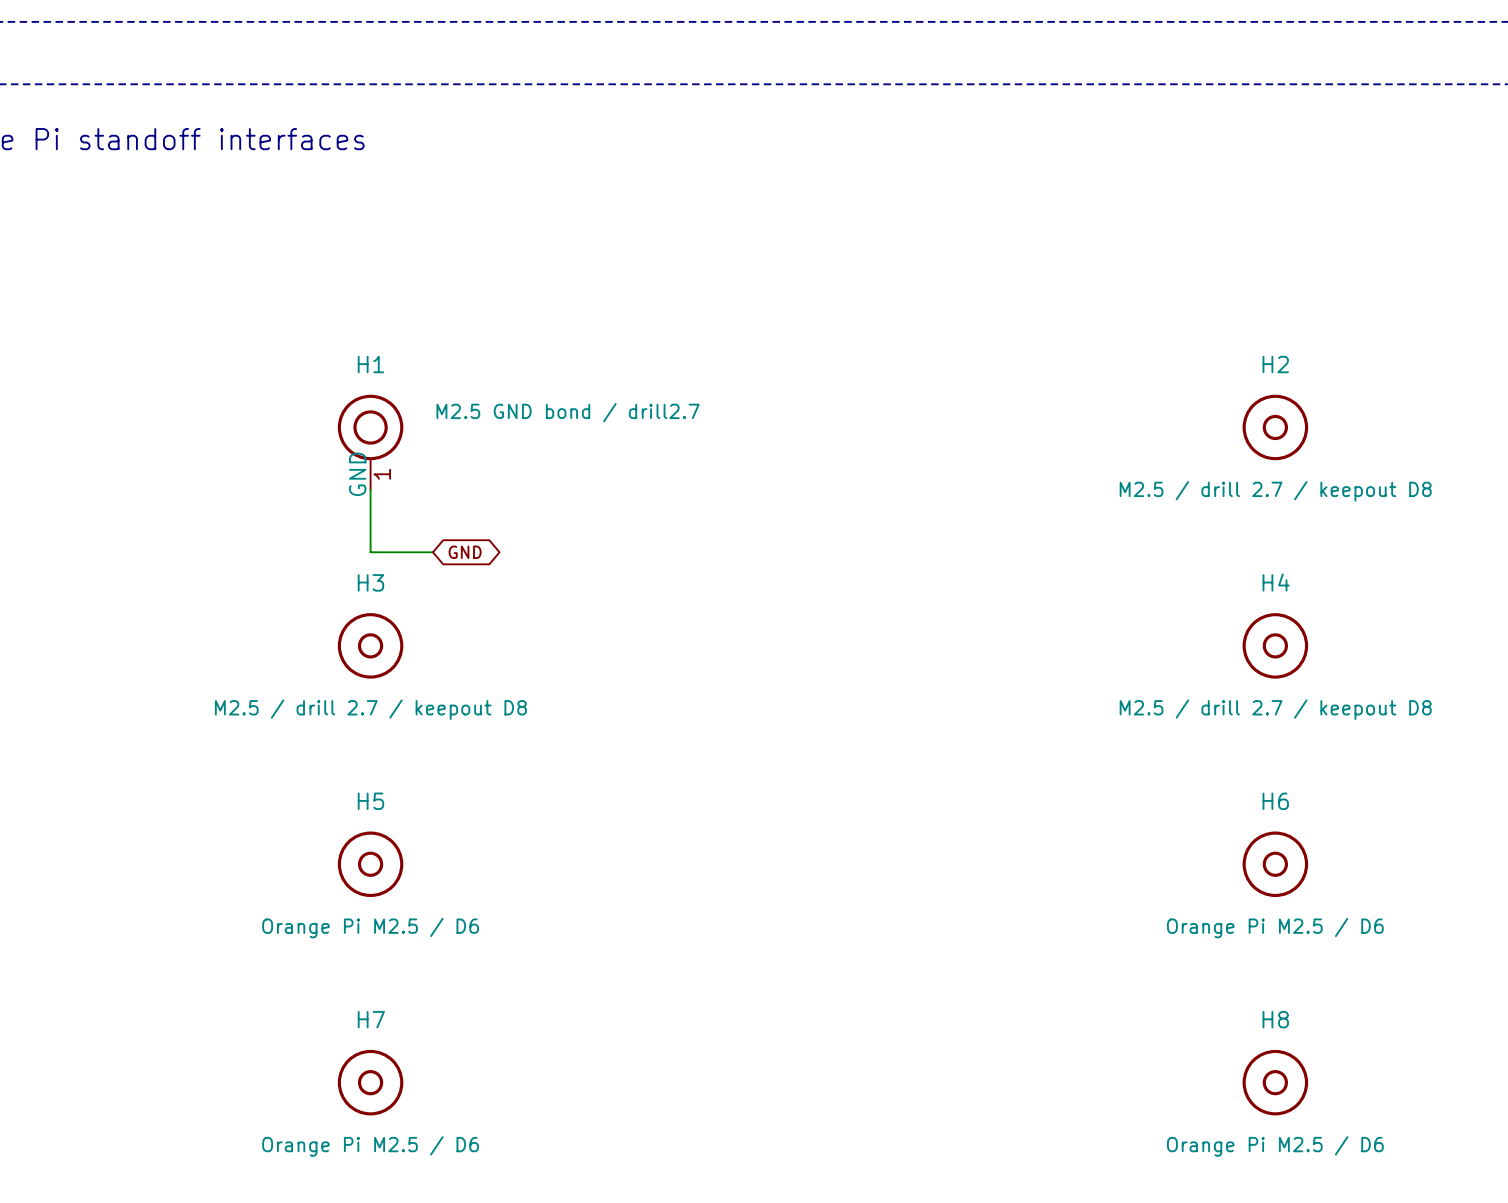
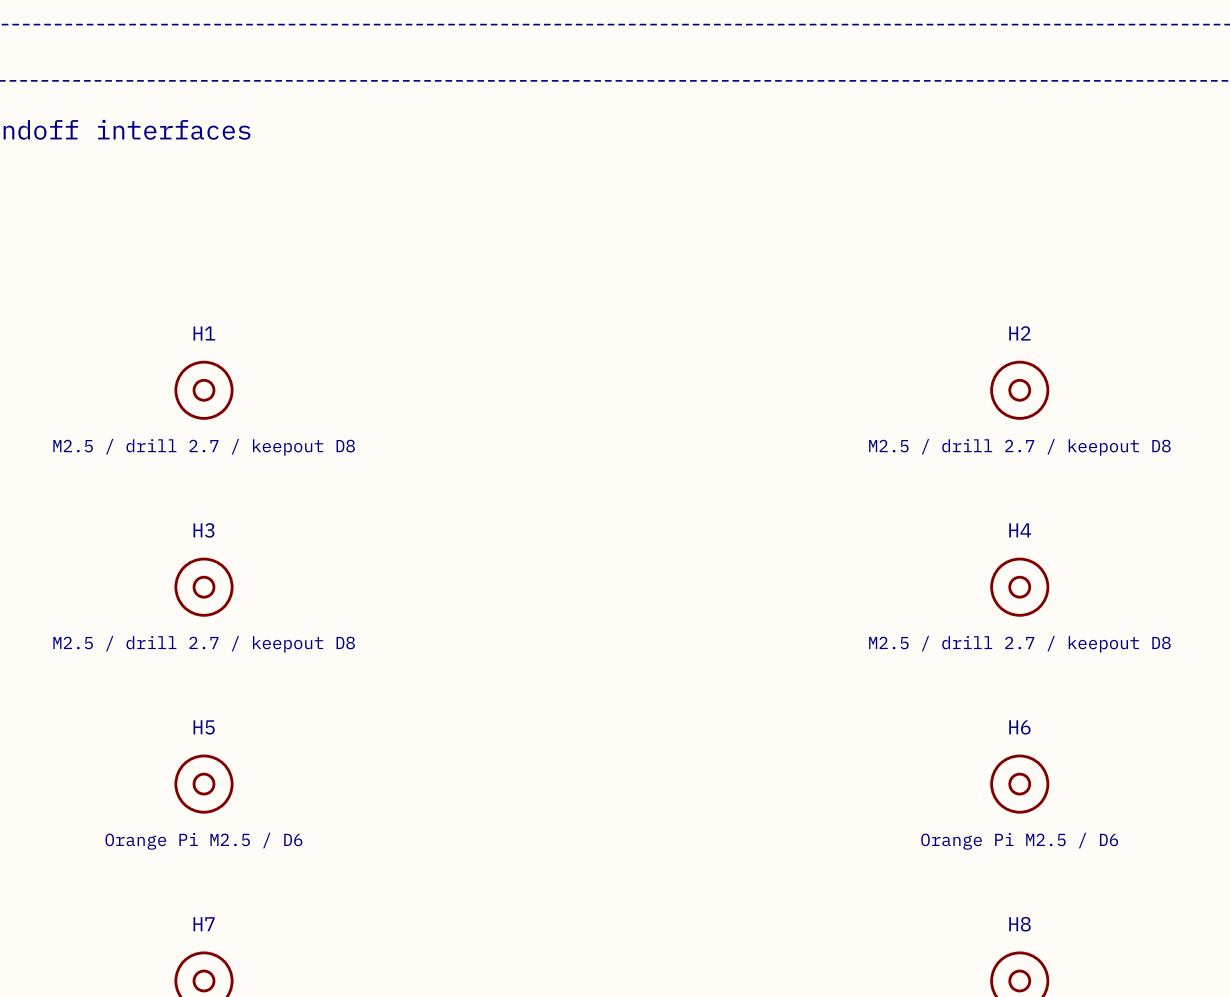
H1 symbol: [337, 394, 404, 490] -> [174, 360, 234, 420]
H1 value: M2.5 GND bond / drill2.7 (568, 412) -> M2.5 / drill 2.7 / keepout D8 (204, 447)
wire: (370, 489) (370, 552) (432, 552) -> none
global label: GND (465, 552) -> none

